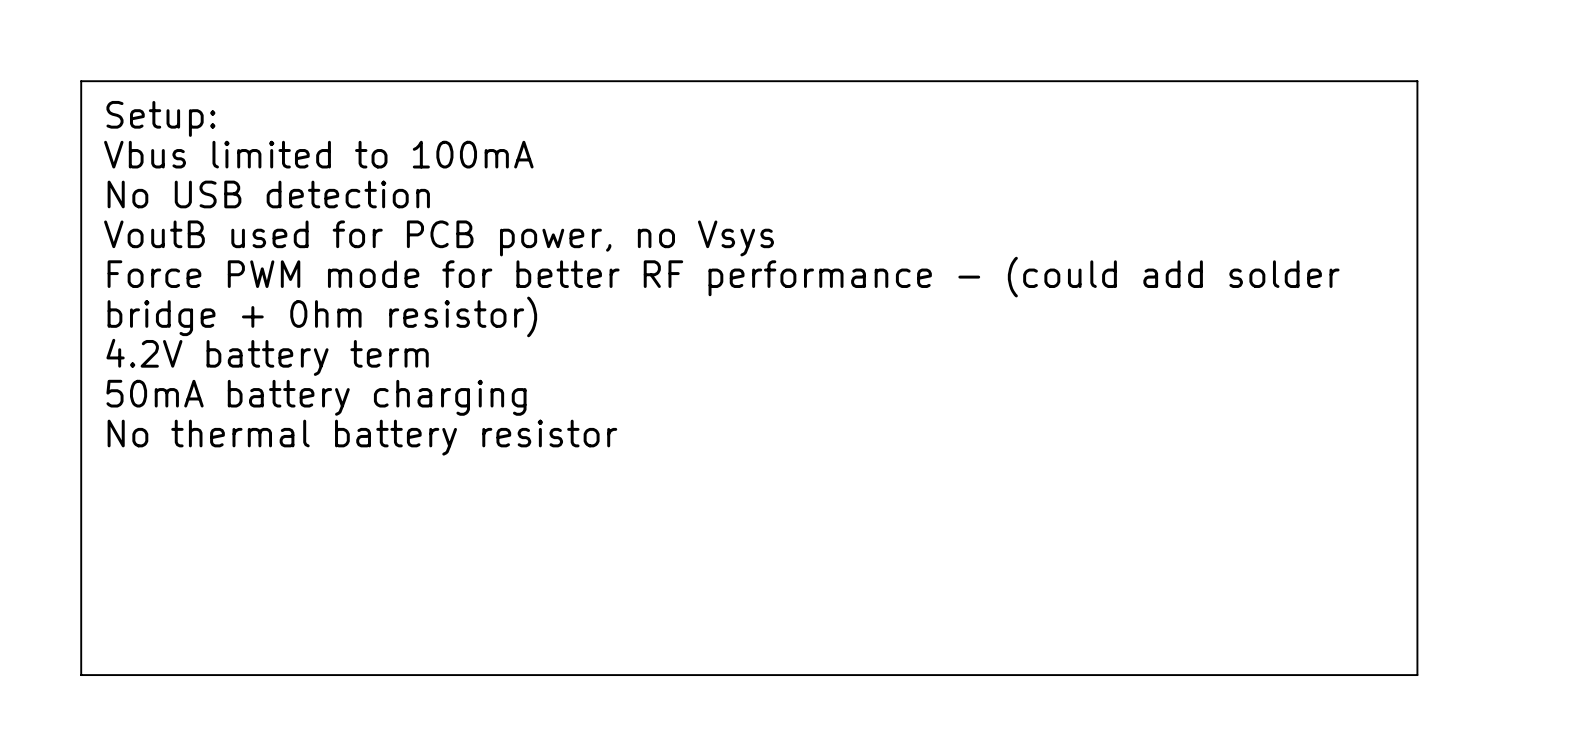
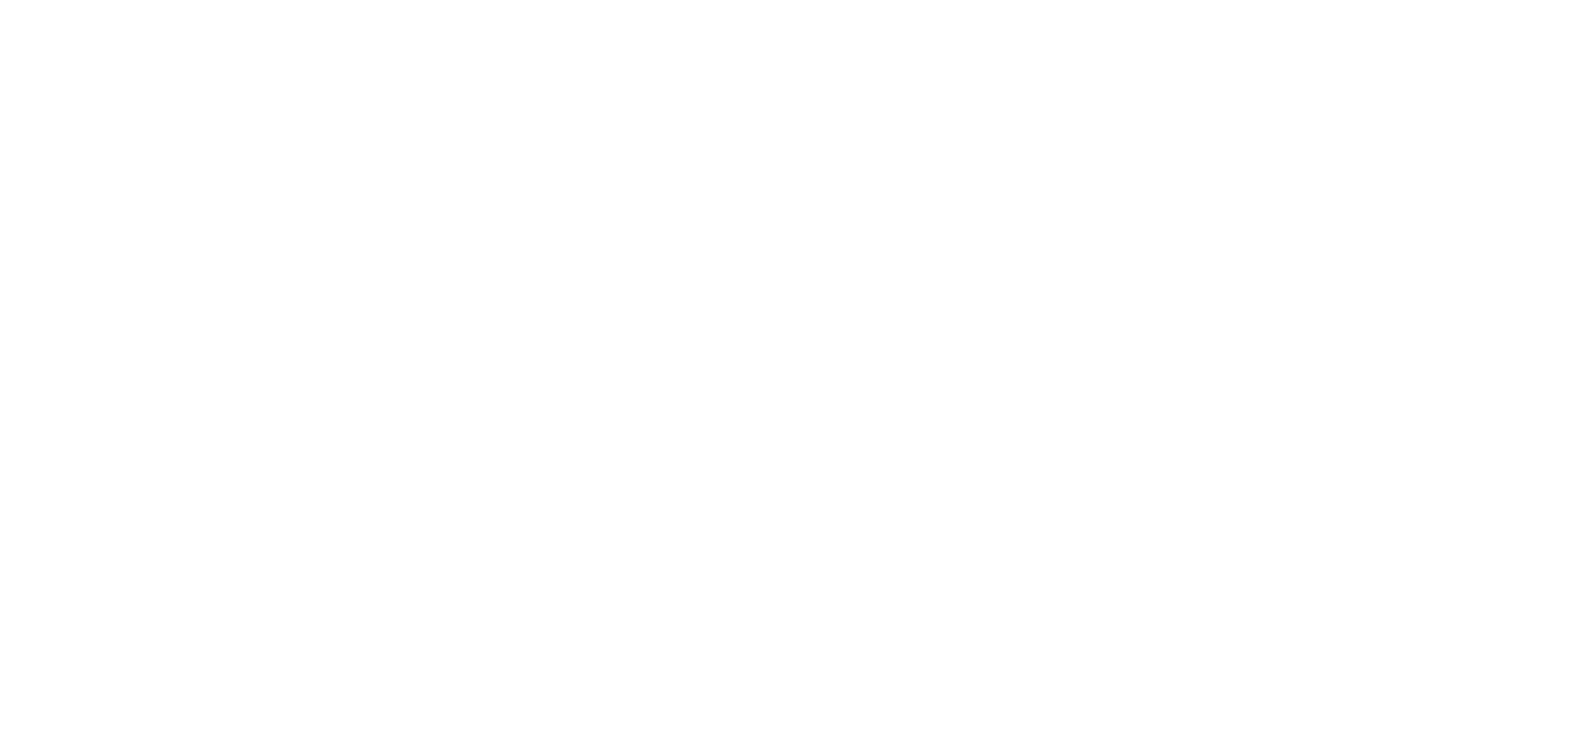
line: (81, 81) (1417, 81) (1417, 675) (81, 675) (81, 81) -> none
text: Setup: (160, 118) -> none
text: Vbus limited to 100mA (318, 154) -> none
text: No USB detection (268, 194) -> none
text: VoutB used for PCB power, no Vsys (439, 238) -> none
text: Force PWM mode for better RF performance - (could add solder (723, 277) -> none
text: bridge + 0hm resistor) (322, 316) -> none
text: 4.2V battery term (267, 357) -> none
text: 50mA battery charging (316, 397) -> none
text: No thermal battery resistor (362, 437) -> none

